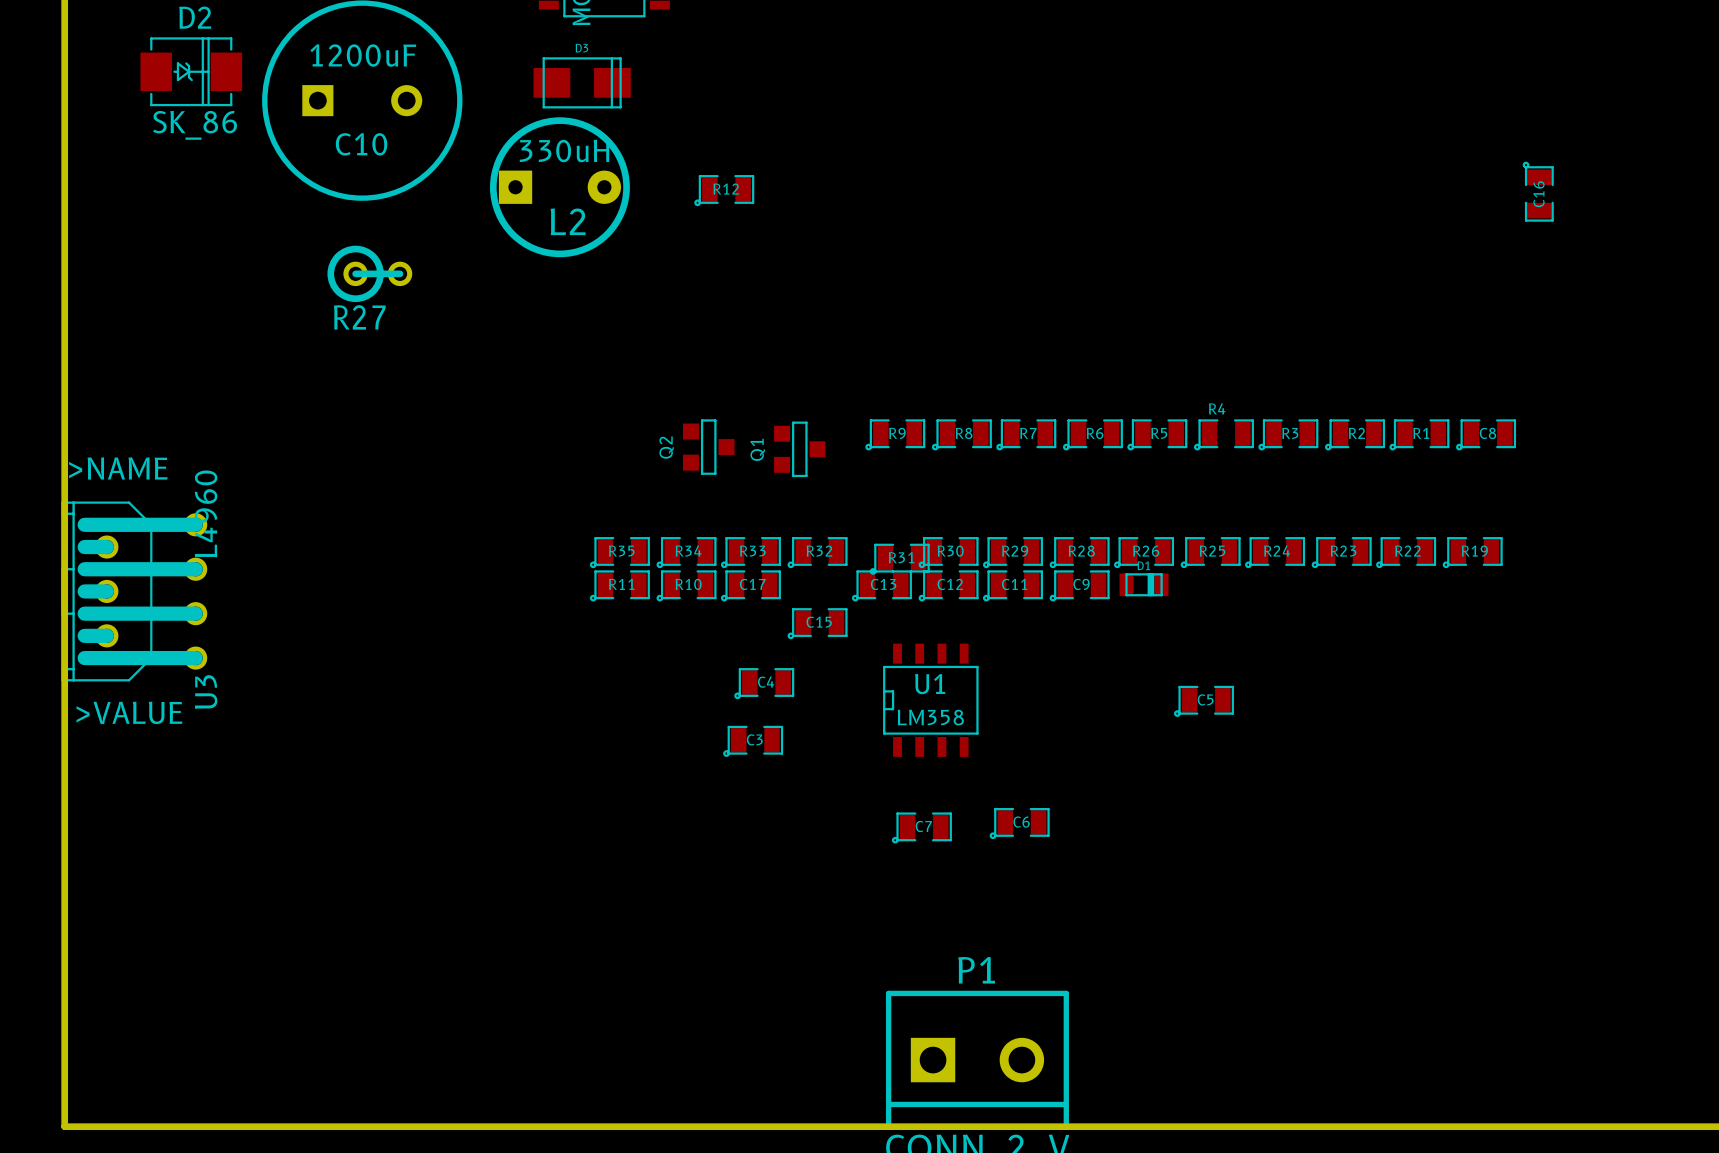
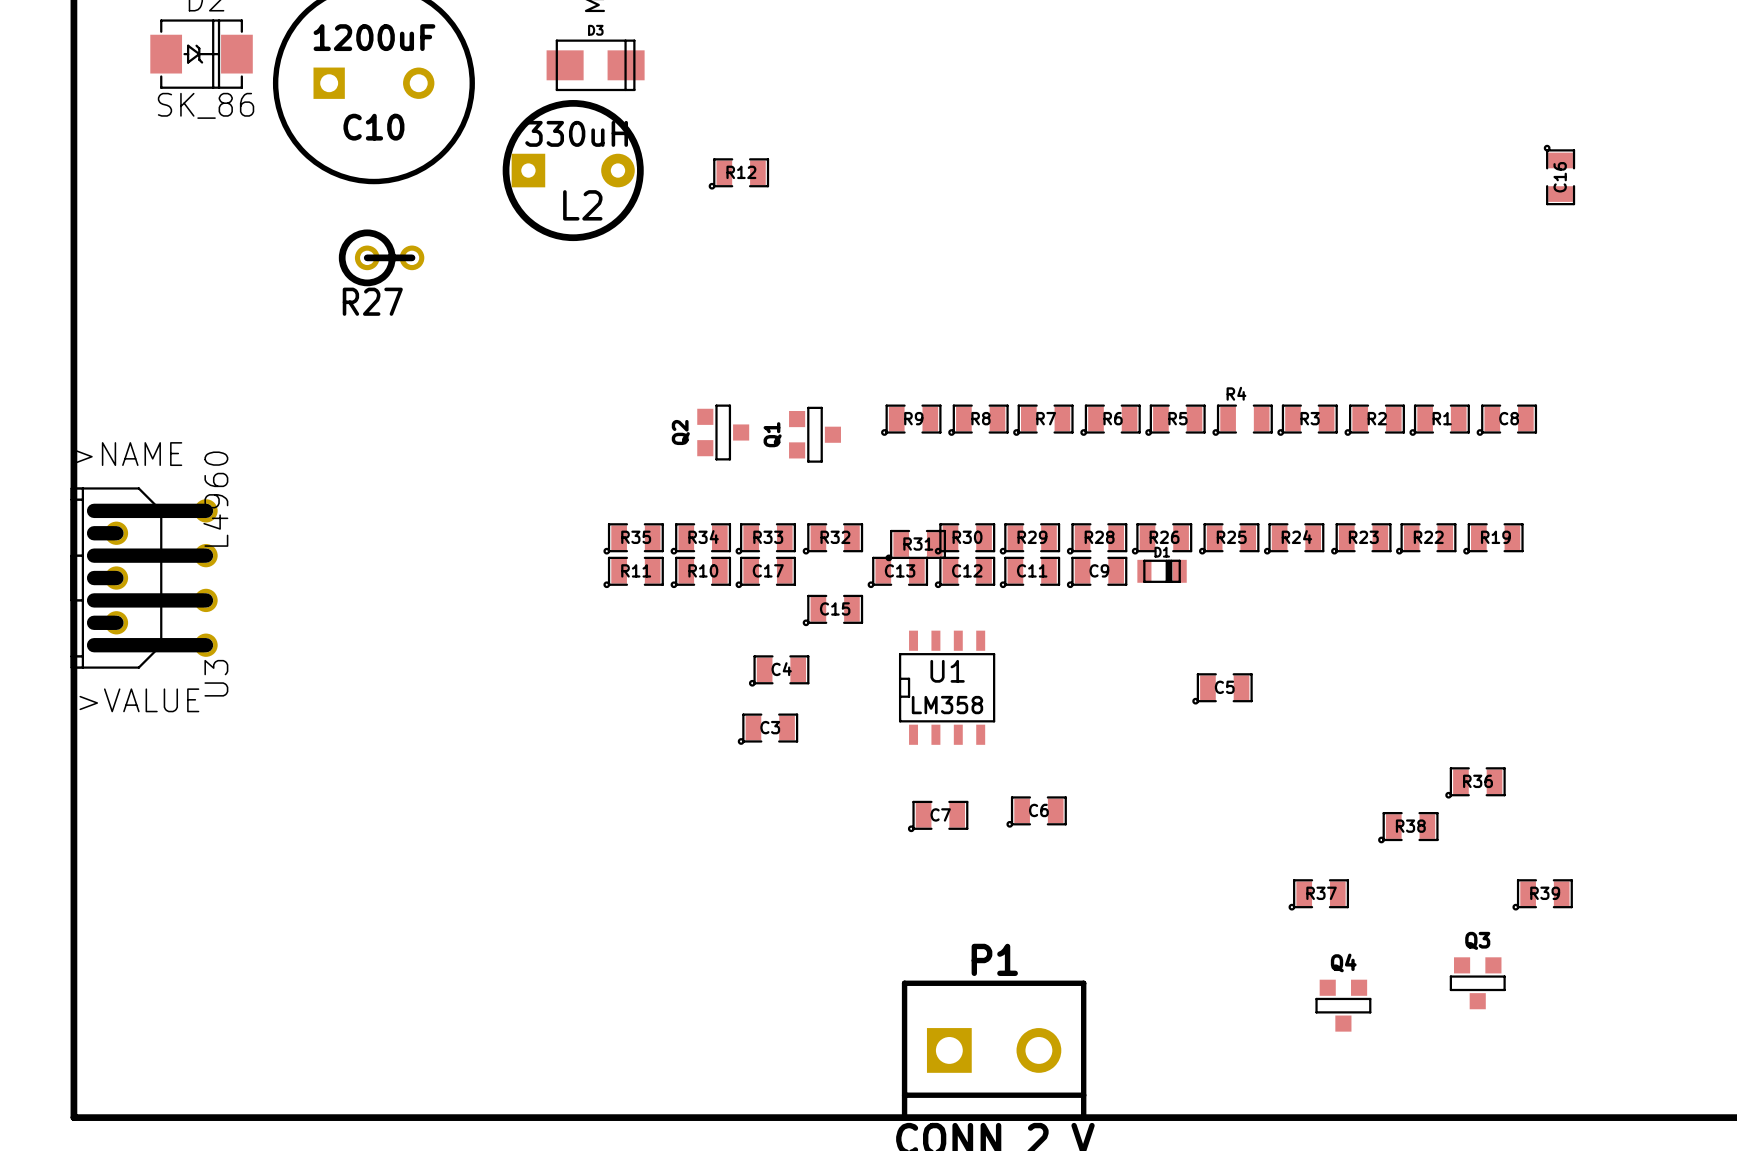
R36: none -> (1475, 782)
R38: none -> (1408, 827)
R37: none -> (1318, 894)
R39: none -> (1542, 894)
Q3: none -> (1477, 983)
Q4: none -> (1343, 1005)

